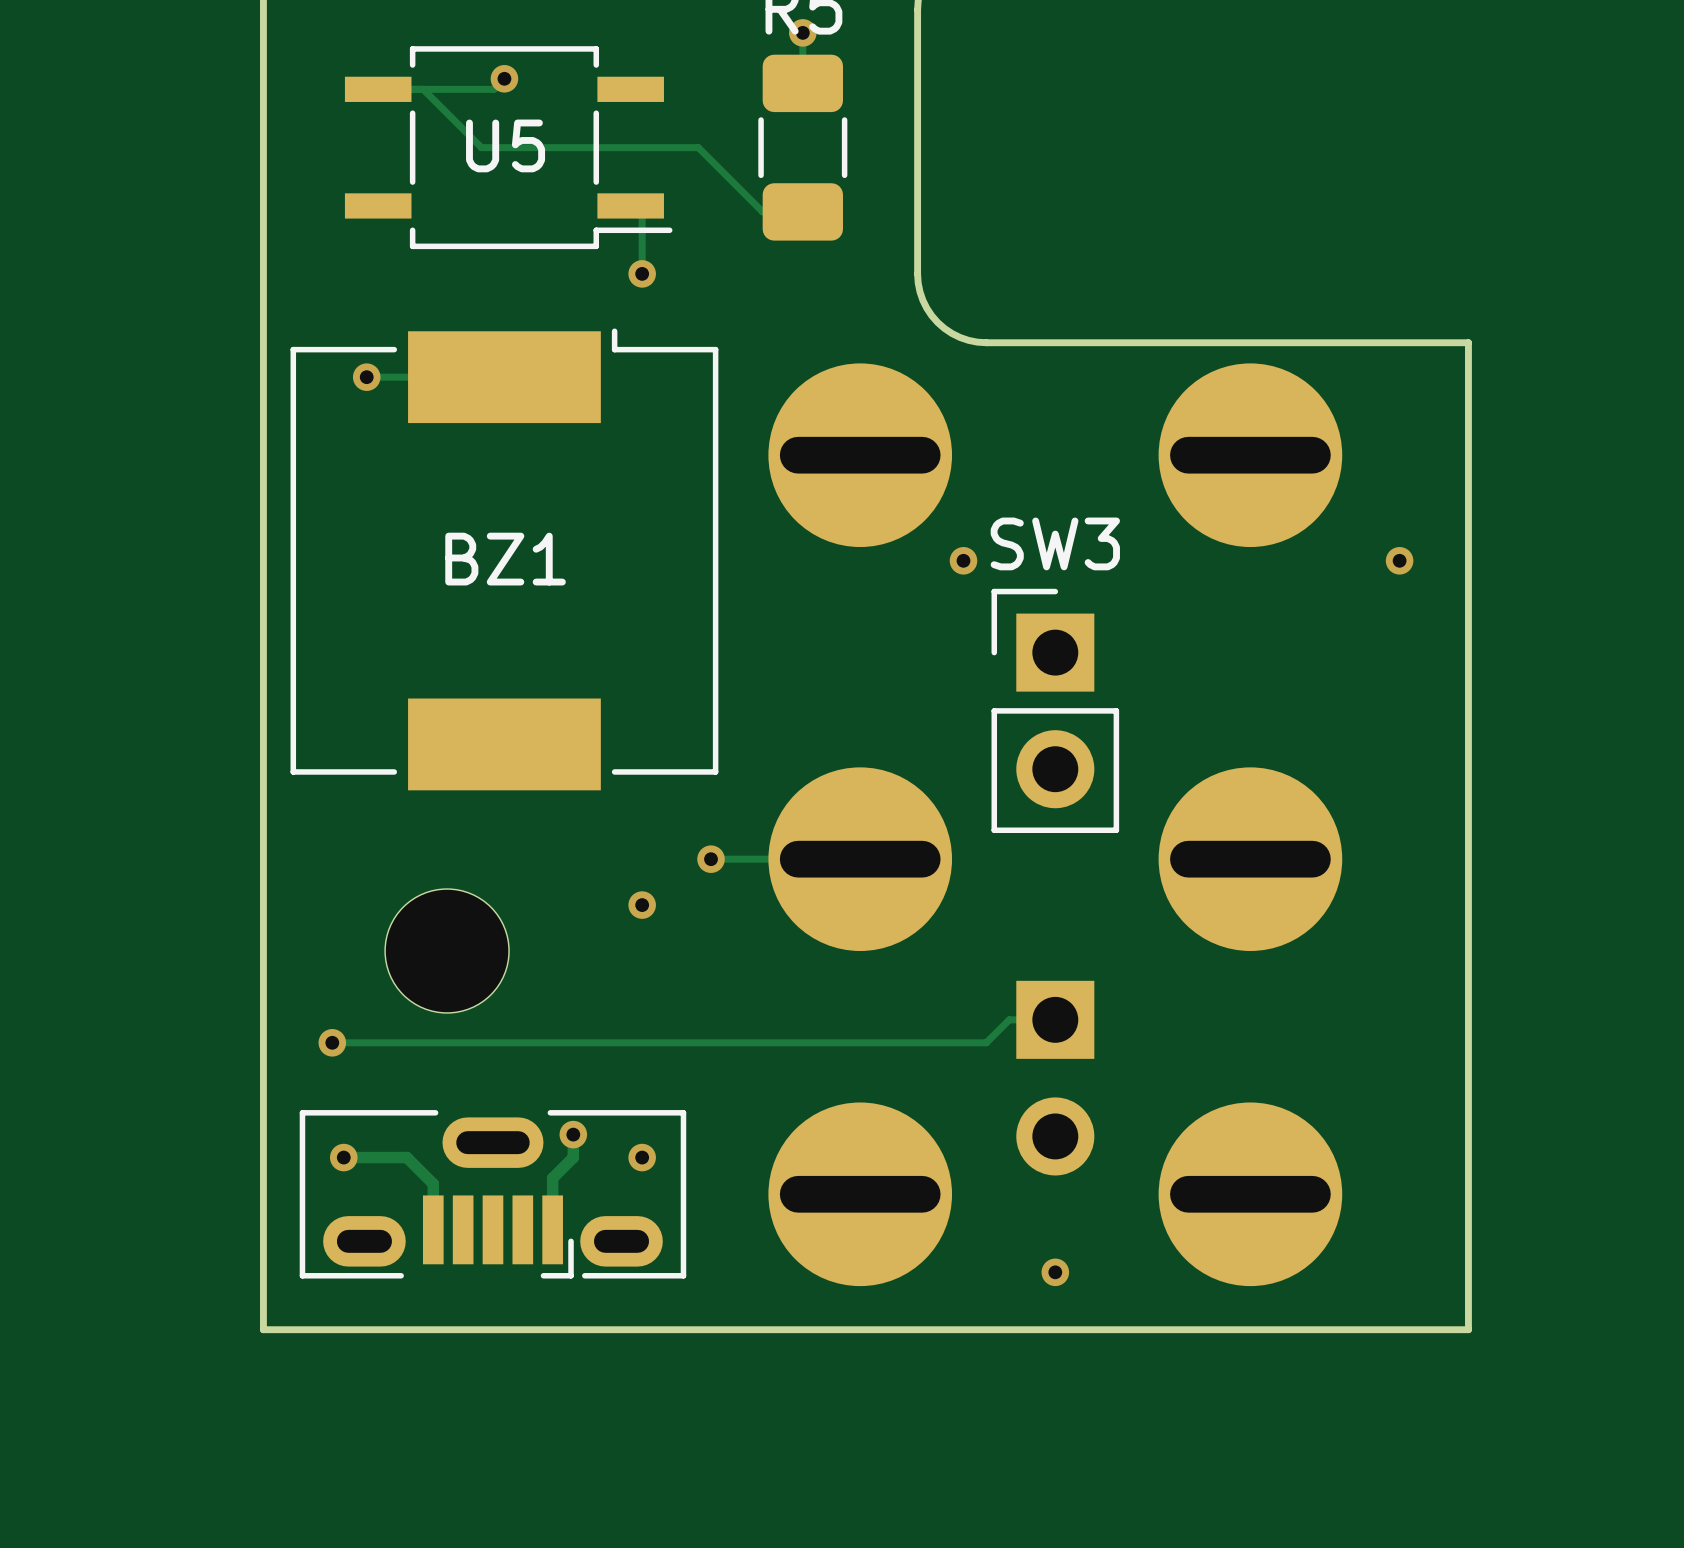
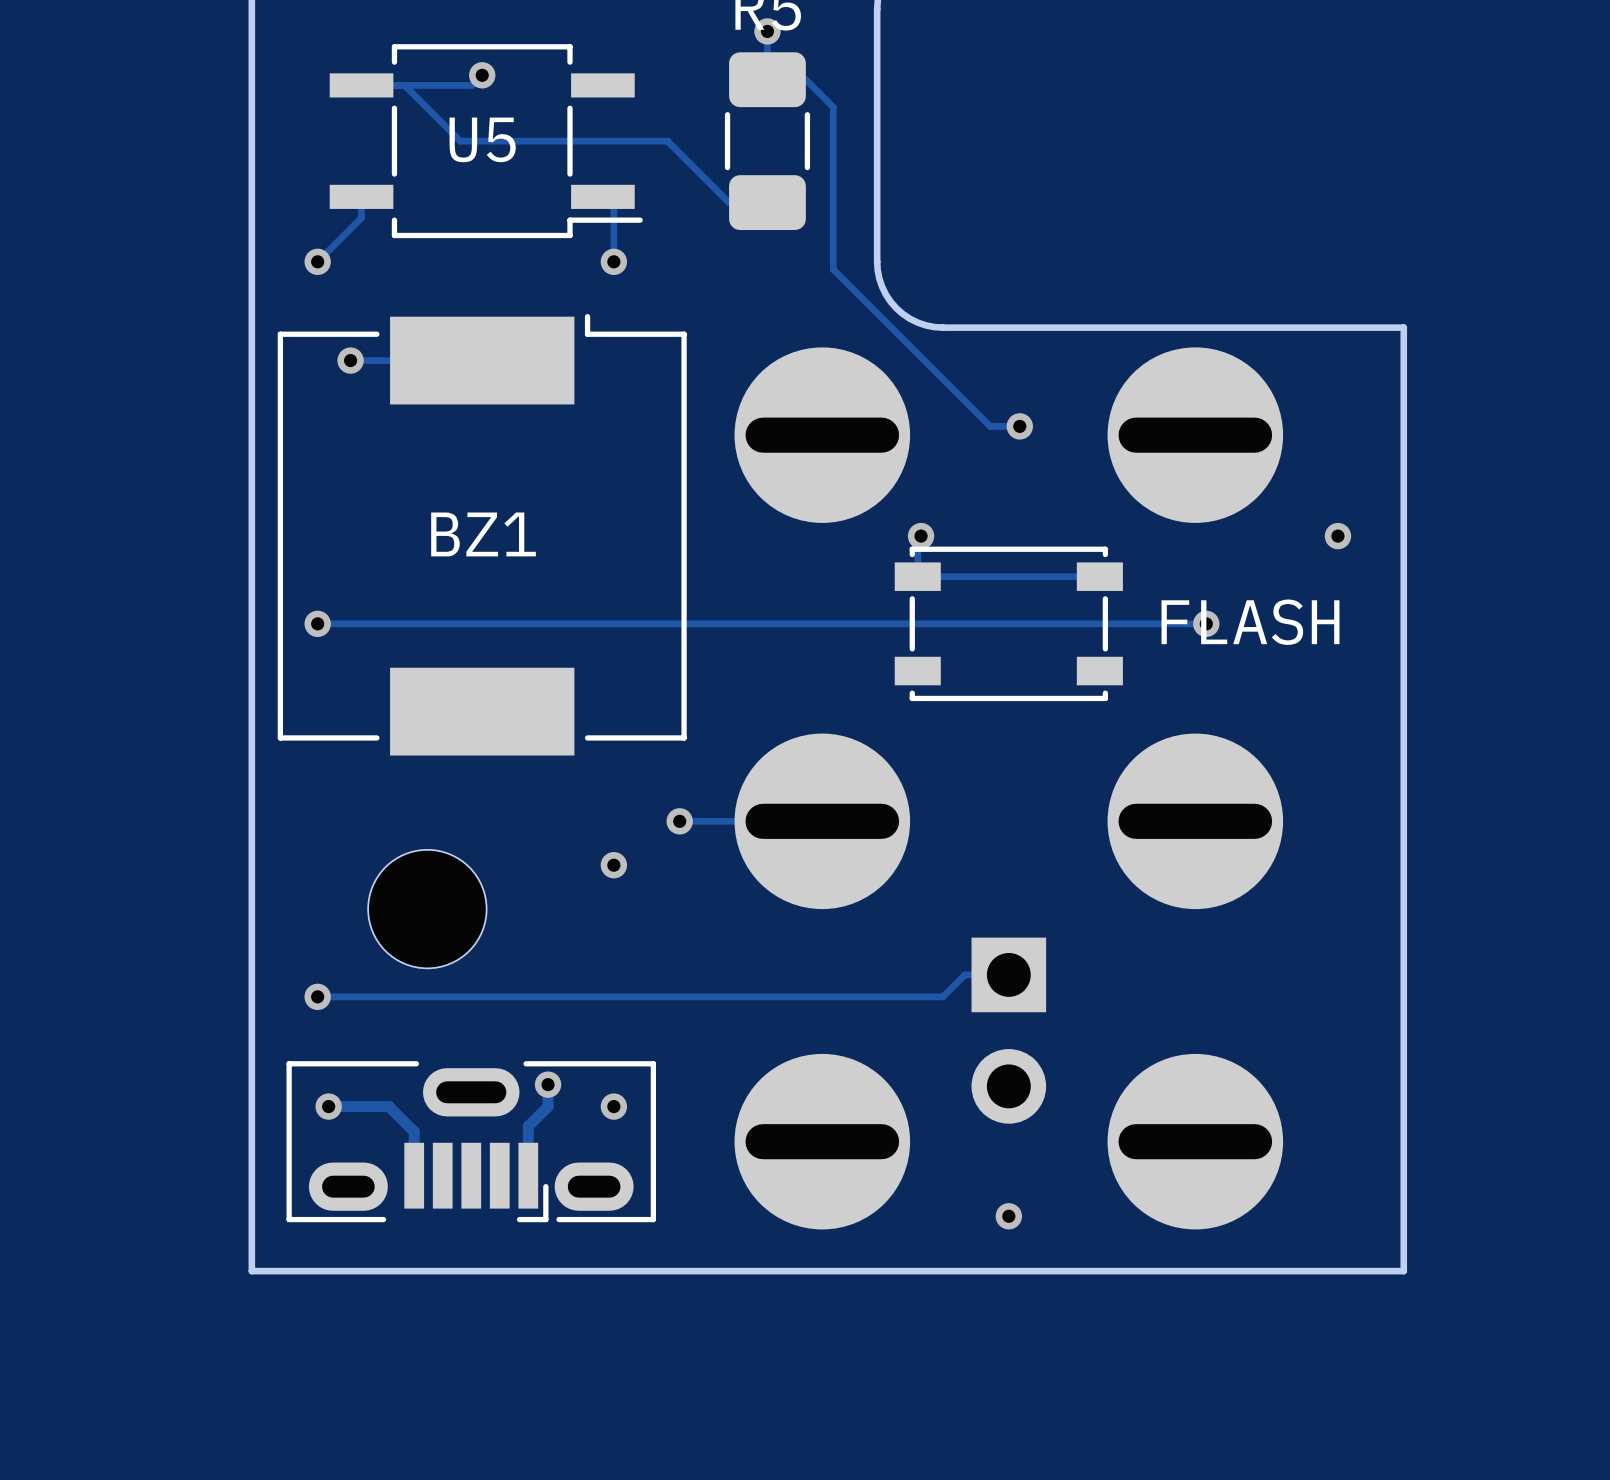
track: none -> (767, 79) (805, 79) (833, 107) (833, 269) (990, 426) (1019, 426)
track: none -> (361, 196) (361, 217) (317, 261)
via: none -> (317, 261)
via: none -> (1019, 426)
track: none -> (917, 539) (917, 576) (1099, 576)
track: none -> (317, 623) (1206, 623)
via: none -> (317, 623)
FLASH: none -> (1008, 623)
via: none -> (1206, 623)
SW3: (1055, 710) -> none

